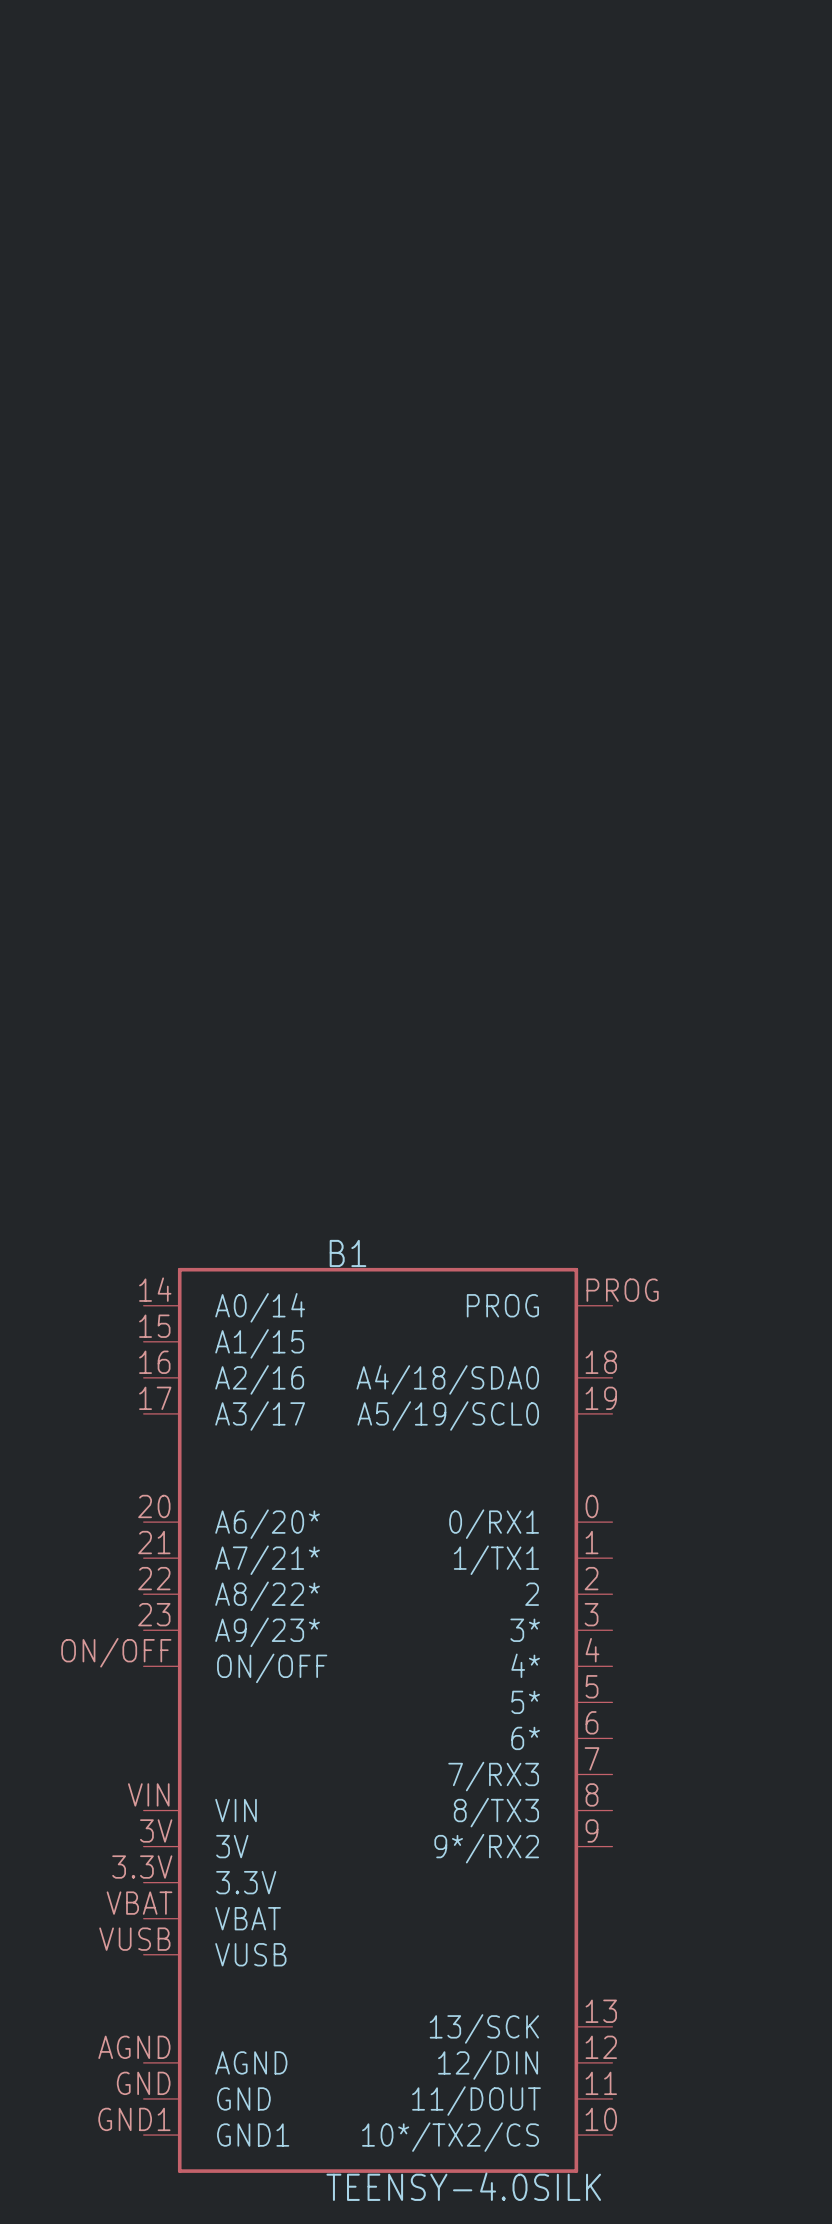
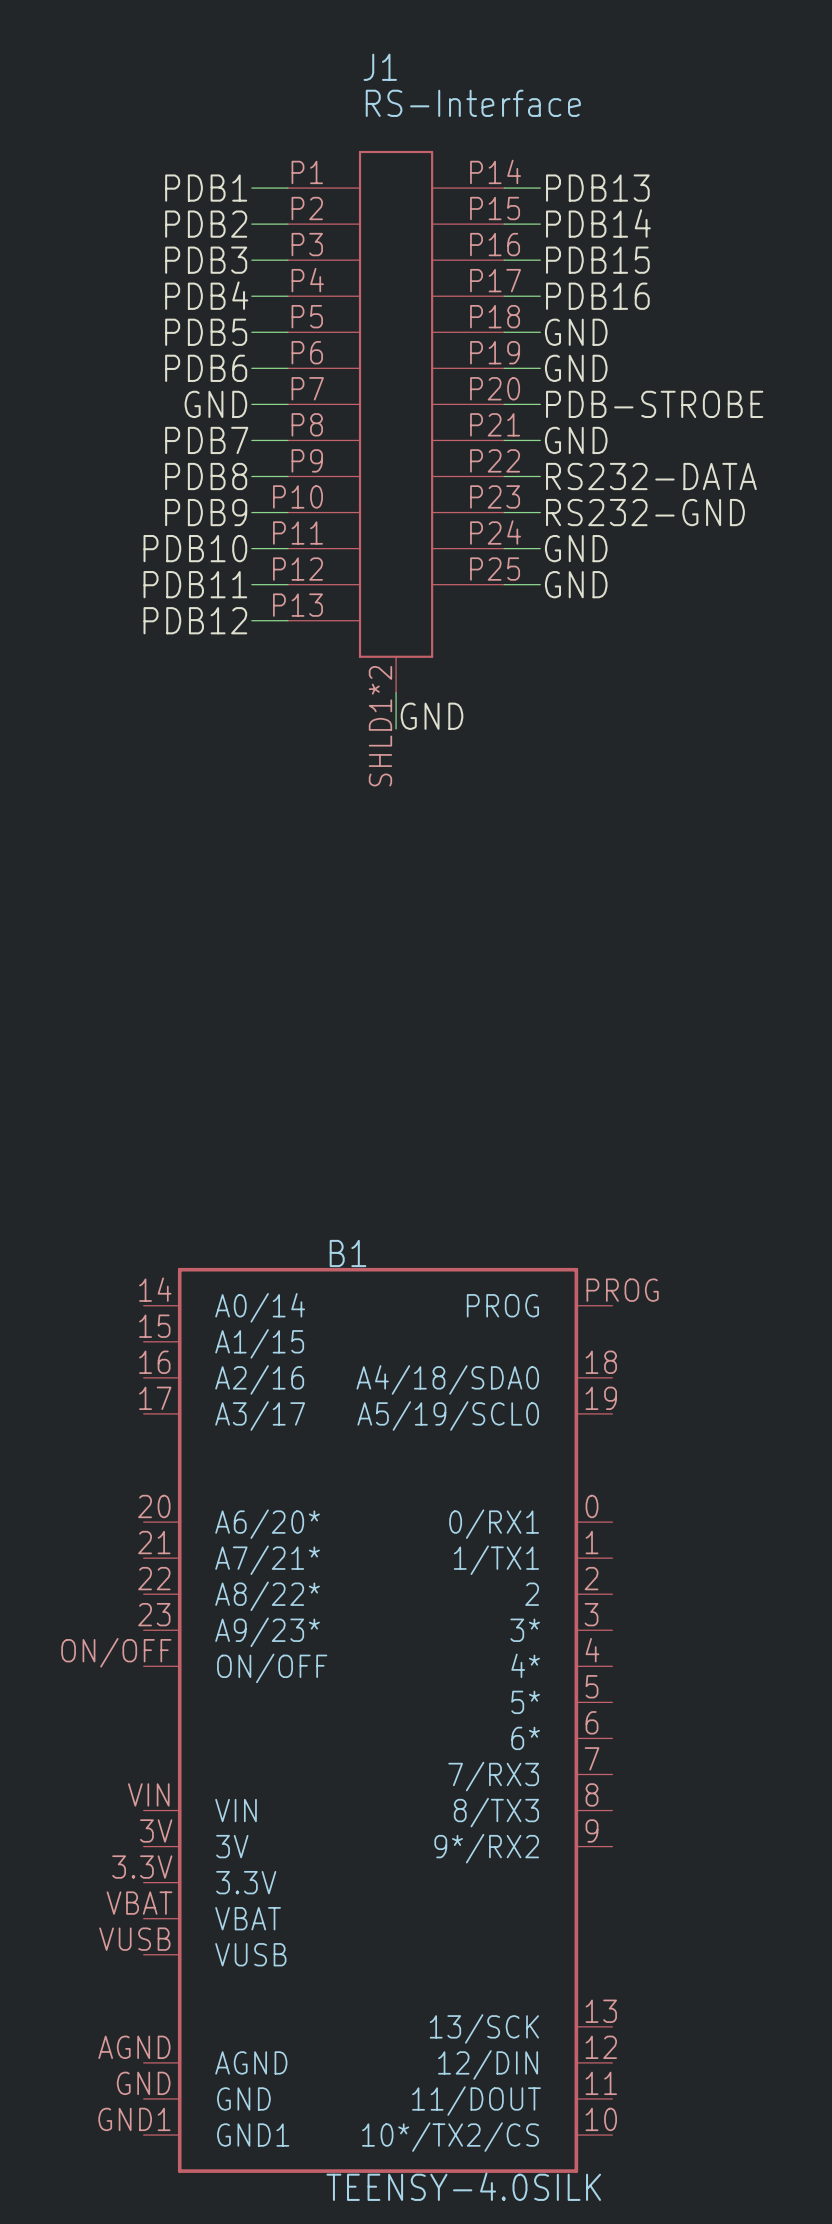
label: none -> PDB1 (206, 188)
wire: none -> (251, 188) (287, 188)
wire: none -> (504, 188) (540, 188)
label: none -> PDB13 (597, 188)
label: none -> PDB14 (598, 223)
label: none -> PDB2 (206, 224)
wire: none -> (251, 224) (287, 224)
wire: none -> (504, 224) (540, 224)
label: none -> PDB3 (206, 260)
wire: none -> (251, 260) (287, 260)
wire: none -> (504, 260) (540, 260)
label: none -> PDB15 (597, 260)
label: none -> PDB4 (206, 295)
wire: none -> (251, 296) (287, 296)
wire: none -> (504, 296) (540, 296)
label: none -> PDB16 (597, 296)
label: none -> PDB5 (206, 332)
wire: none -> (251, 332) (287, 332)
wire: none -> (504, 332) (540, 332)
label: none -> GND (576, 332)
label: none -> PDB6 (206, 368)
wire: none -> (251, 368) (287, 368)
wire: none -> (504, 368) (540, 368)
label: none -> GND (576, 368)
label: none -> GND (215, 404)
wire: none -> (251, 404) (287, 404)
wire: none -> (504, 404) (540, 404)
label: none -> PDB-STROBE (654, 404)
J1: none -> RS-Interface (396, 421)
label: none -> PDB7 (206, 440)
wire: none -> (251, 440) (287, 440)
wire: none -> (504, 440) (540, 440)
label: none -> GND (576, 440)
label: none -> PDB8 (206, 476)
wire: none -> (251, 476) (287, 476)
wire: none -> (504, 476) (540, 476)
label: none -> RS232-DATA (651, 476)
label: none -> PDB9 (206, 512)
wire: none -> (251, 512) (287, 512)
wire: none -> (504, 512) (540, 512)
label: none -> RS232-GND (645, 512)
label: none -> PDB10 (195, 548)
wire: none -> (251, 548) (287, 548)
wire: none -> (504, 548) (540, 548)
label: none -> GND (576, 548)
label: none -> PDB11 (195, 584)
wire: none -> (251, 584) (287, 584)
wire: none -> (504, 584) (540, 584)
label: none -> GND (576, 584)
label: none -> PDB12 (195, 620)
wire: none -> (251, 620) (287, 620)
wire: none -> (396, 692) (396, 728)
label: none -> GND (432, 716)

